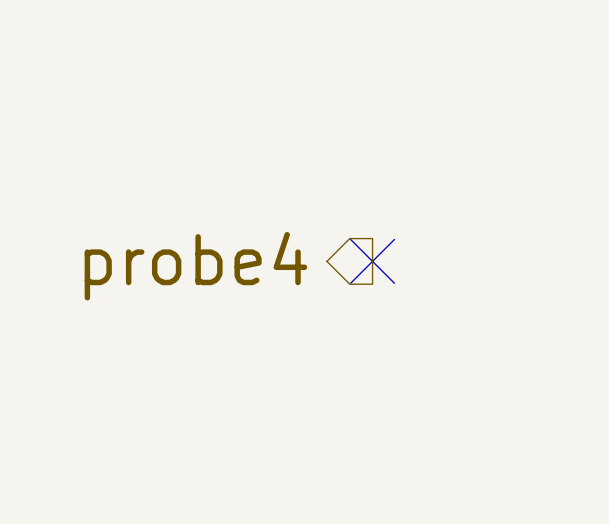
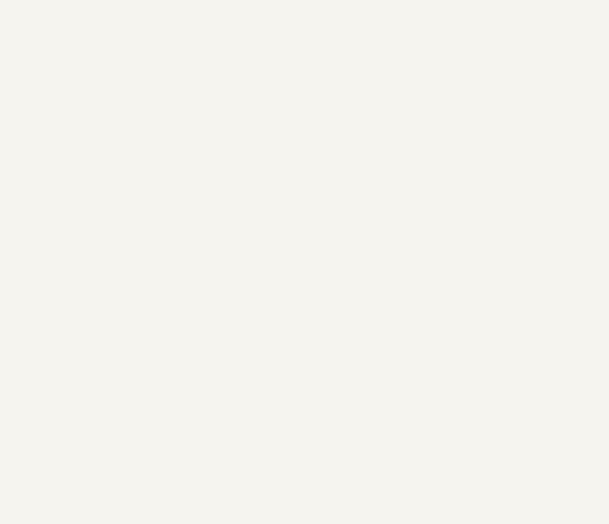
no-connect mark: (372, 261) -> none
hierarchical label: probe4 (195, 266) -> none

